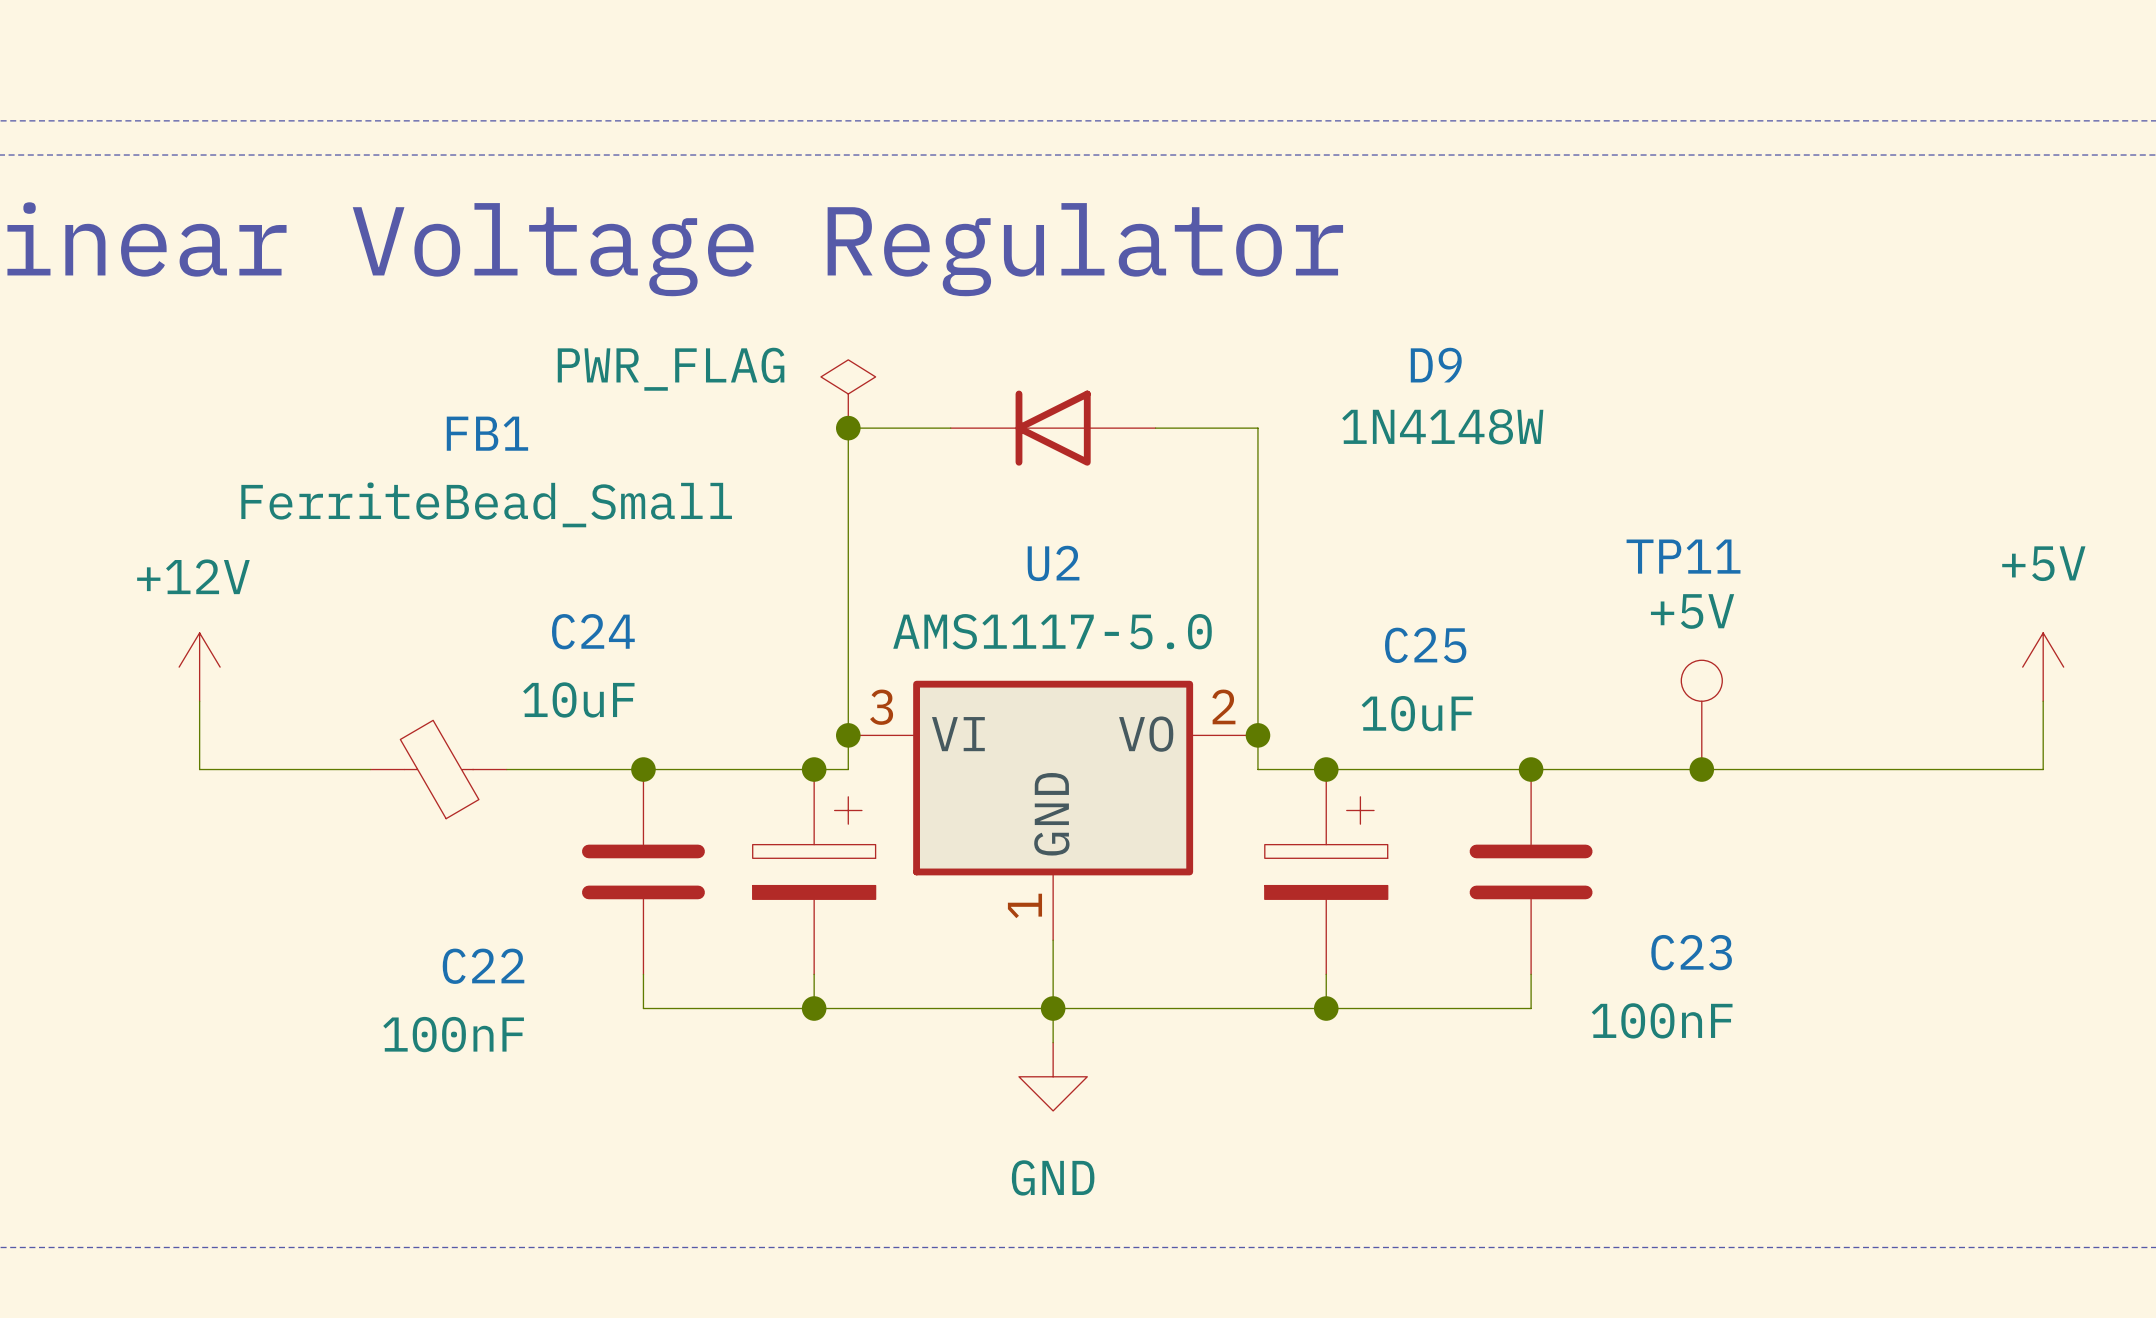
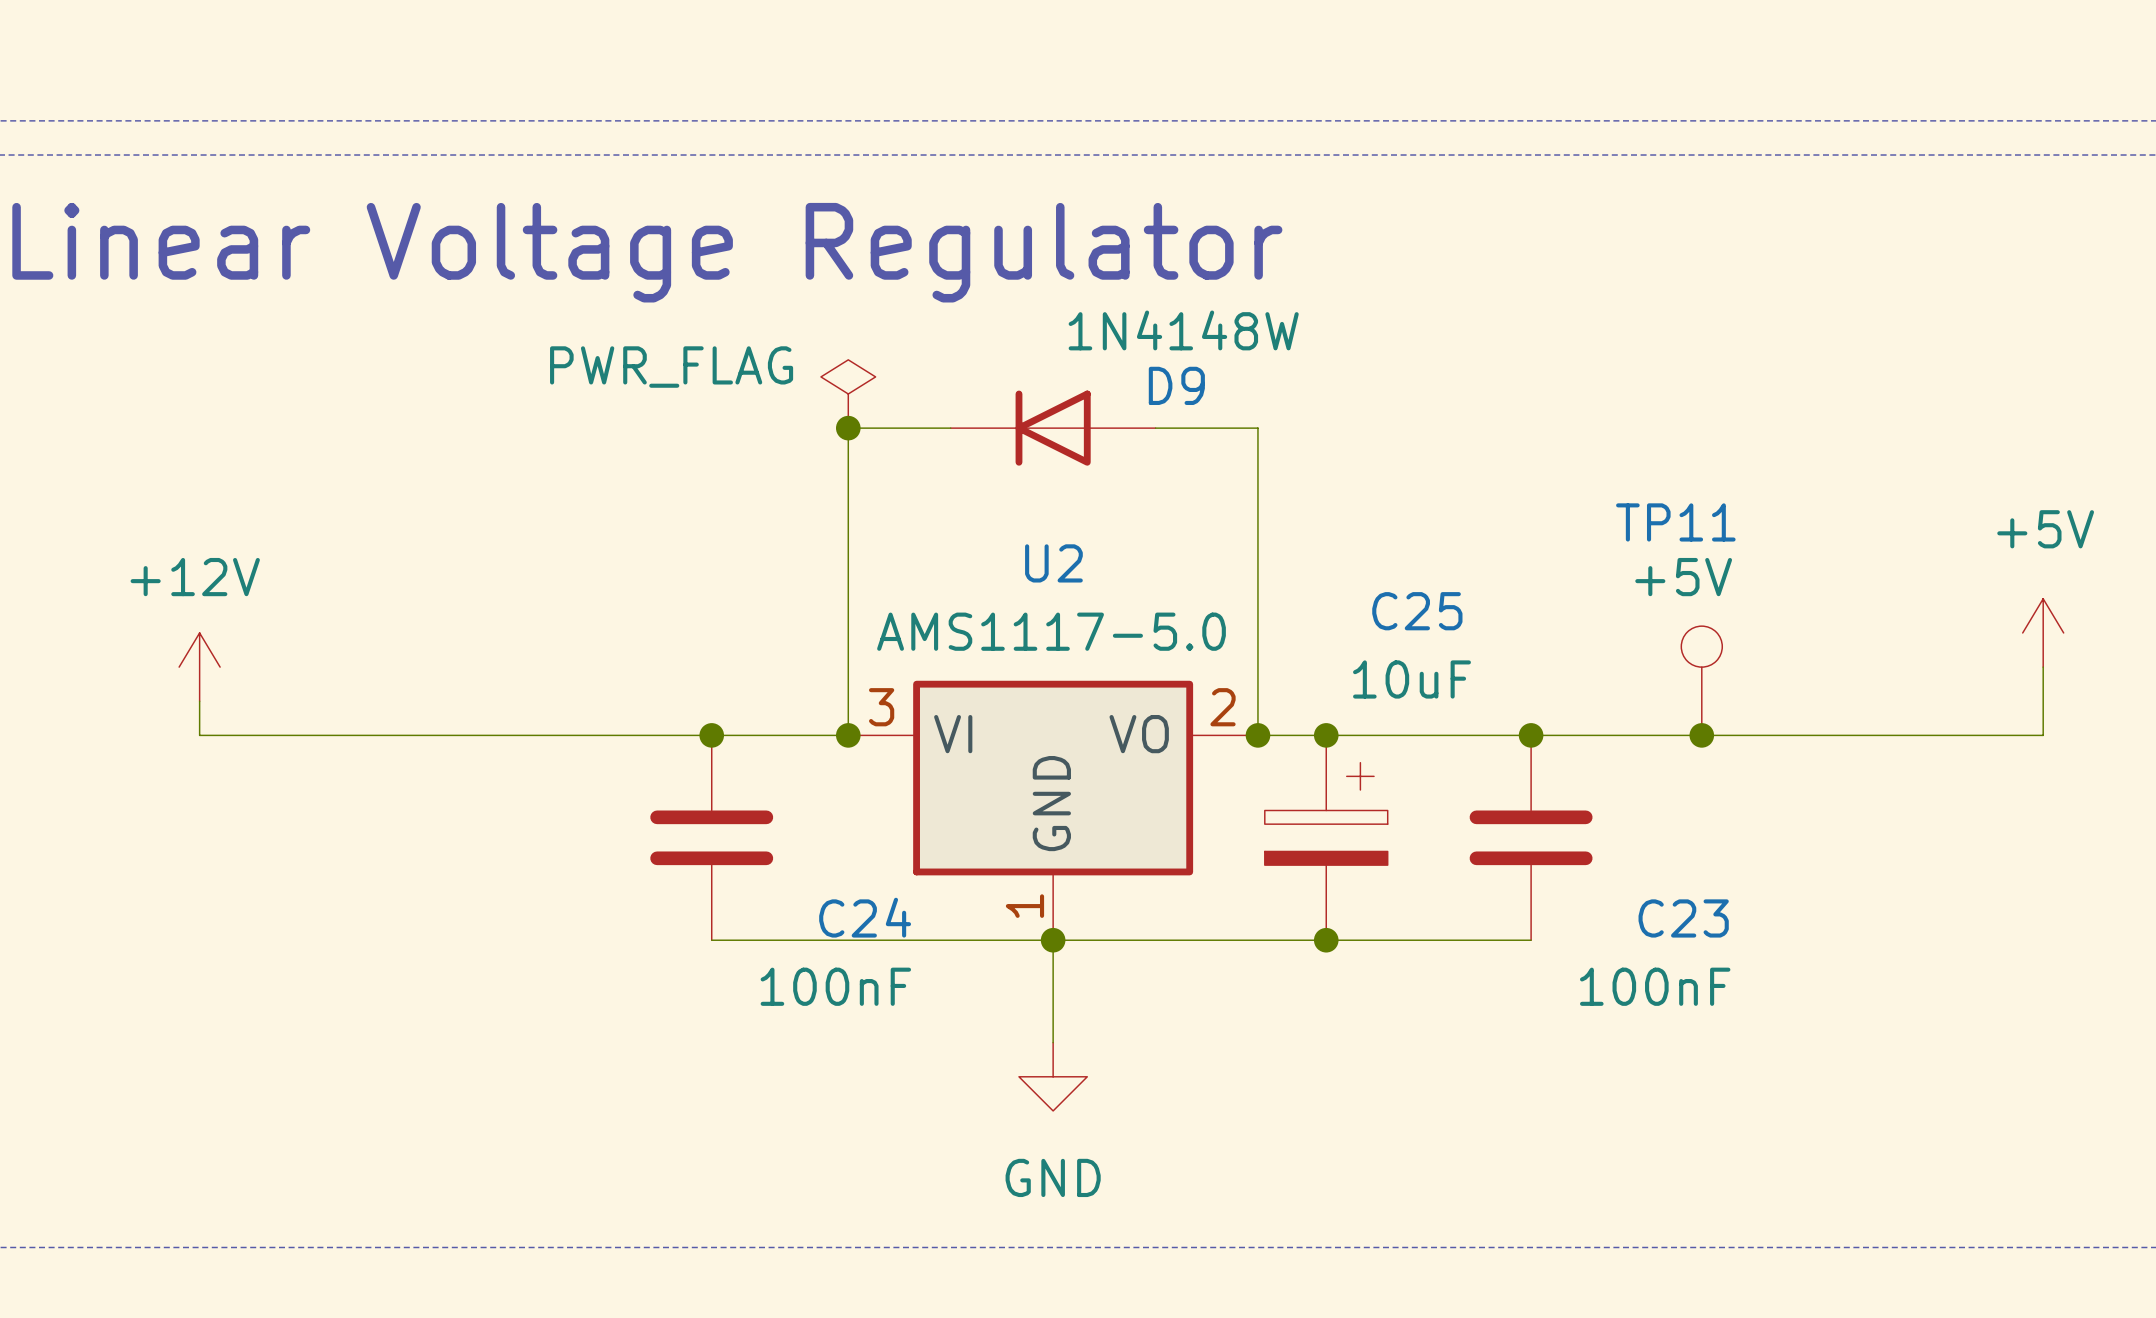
D9 name position: D9 (1436, 365) -> D9 (1176, 385)
D9 value position: 1N4148W (1442, 426) -> 1N4148W (1183, 330)
C24 name position: C24 (593, 631) -> C24 (865, 917)
power symbol position: +5V (2043, 667) -> +5V (2043, 632)
C24 value: 10uF (578, 699) -> 100nF (835, 986)
TP11 position: (1701, 714) -> (1701, 680)
wire: (199, 735) (199, 769) (370, 769) -> none
junction: none -> (711, 735)
wire: (848, 735) (848, 769) (506, 769) -> (848, 735) (199, 735)
wire: (1257, 735) (1257, 769) (2043, 769) (2043, 735) -> (1257, 735) (2043, 735)
FB1: FerriteBead_Small (438, 769) -> none
junction: (643, 769) -> none
C24 symbol: [752, 769, 876, 975] -> [650, 735, 774, 941]
junction: (814, 769) -> none
junction position: (1326, 769) -> (1326, 735)
junction position: (1531, 769) -> (1531, 735)
junction position: (1701, 769) -> (1701, 735)
C22: 100nF (643, 871) -> none
C25 position: (1326, 871) -> (1326, 837)
C23 position: (1531, 871) -> (1531, 837)
wire: none -> (711, 940) (1531, 940)
wire: (643, 974) (643, 1008) (1531, 1008) (1531, 974) -> none
wire: (814, 974) (814, 1008) -> none
wire: (1326, 974) (1326, 1008) -> none
junction: (814, 1008) -> none
junction position: (1053, 1008) -> (1053, 940)
junction position: (1326, 1008) -> (1326, 940)

